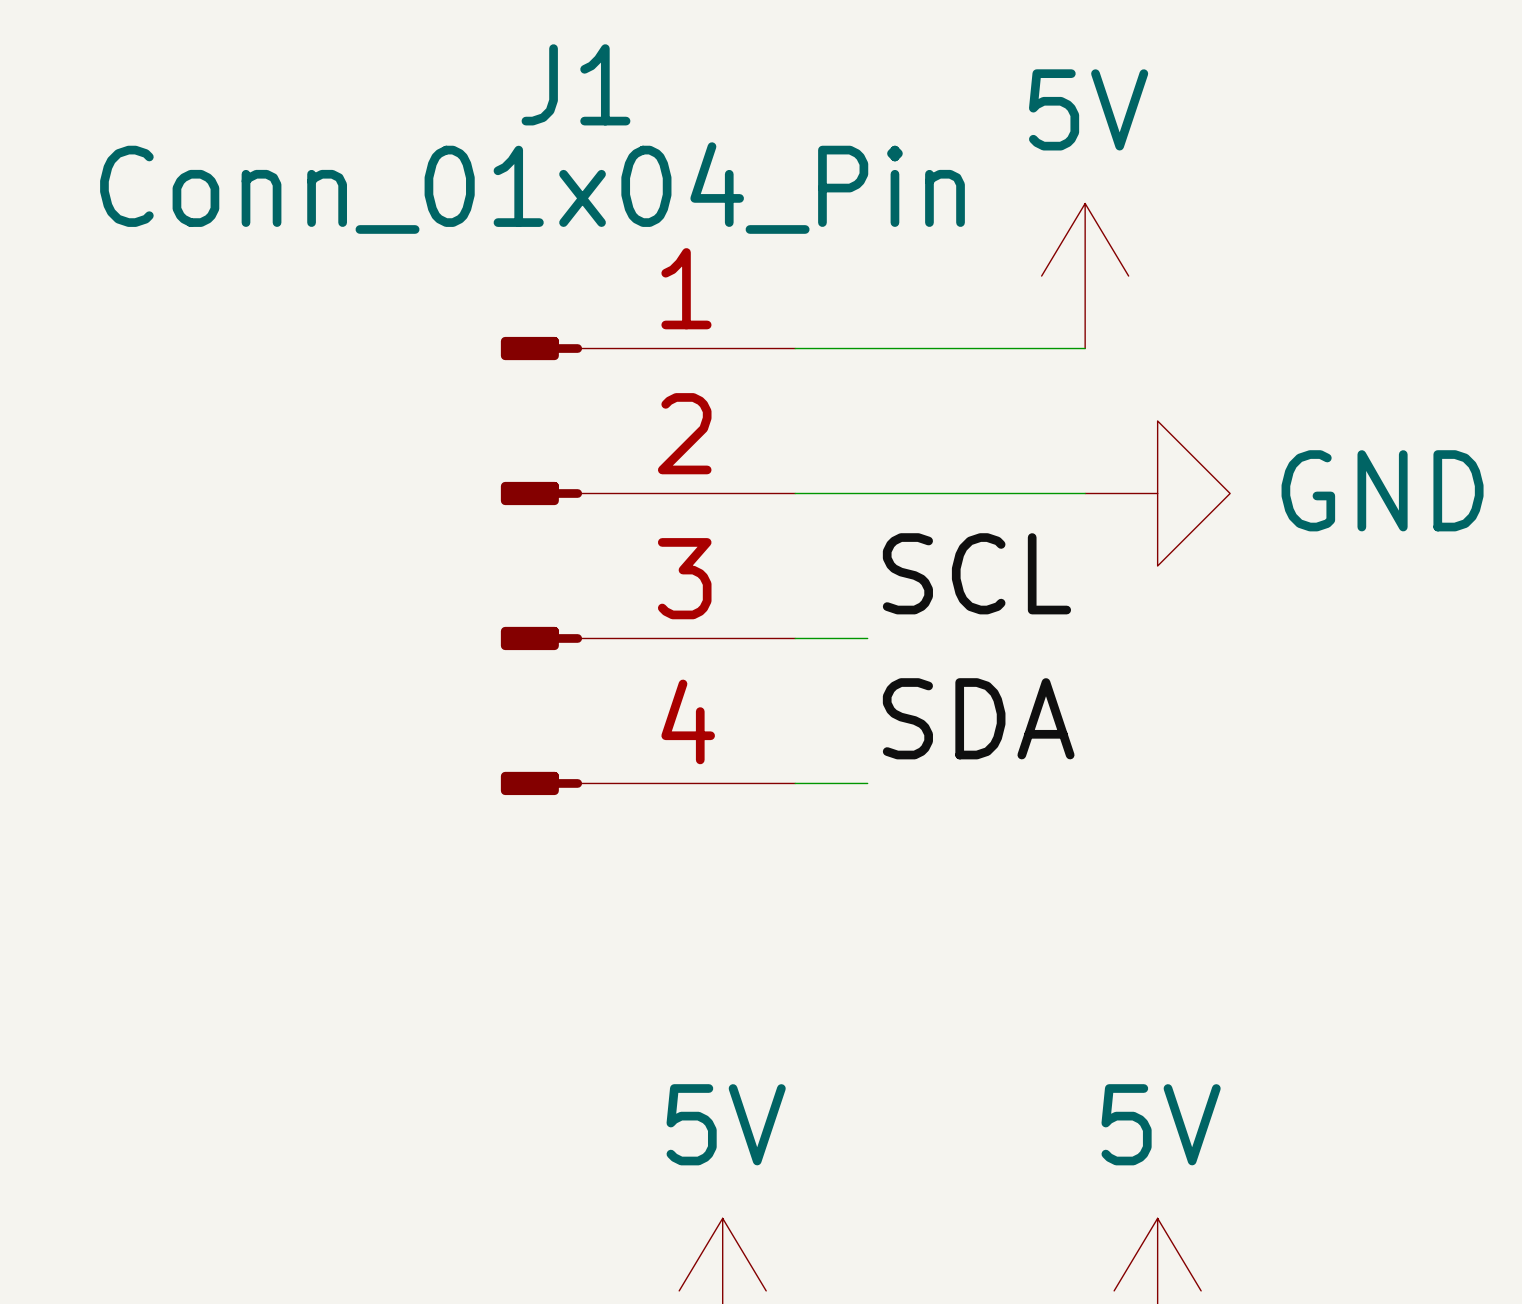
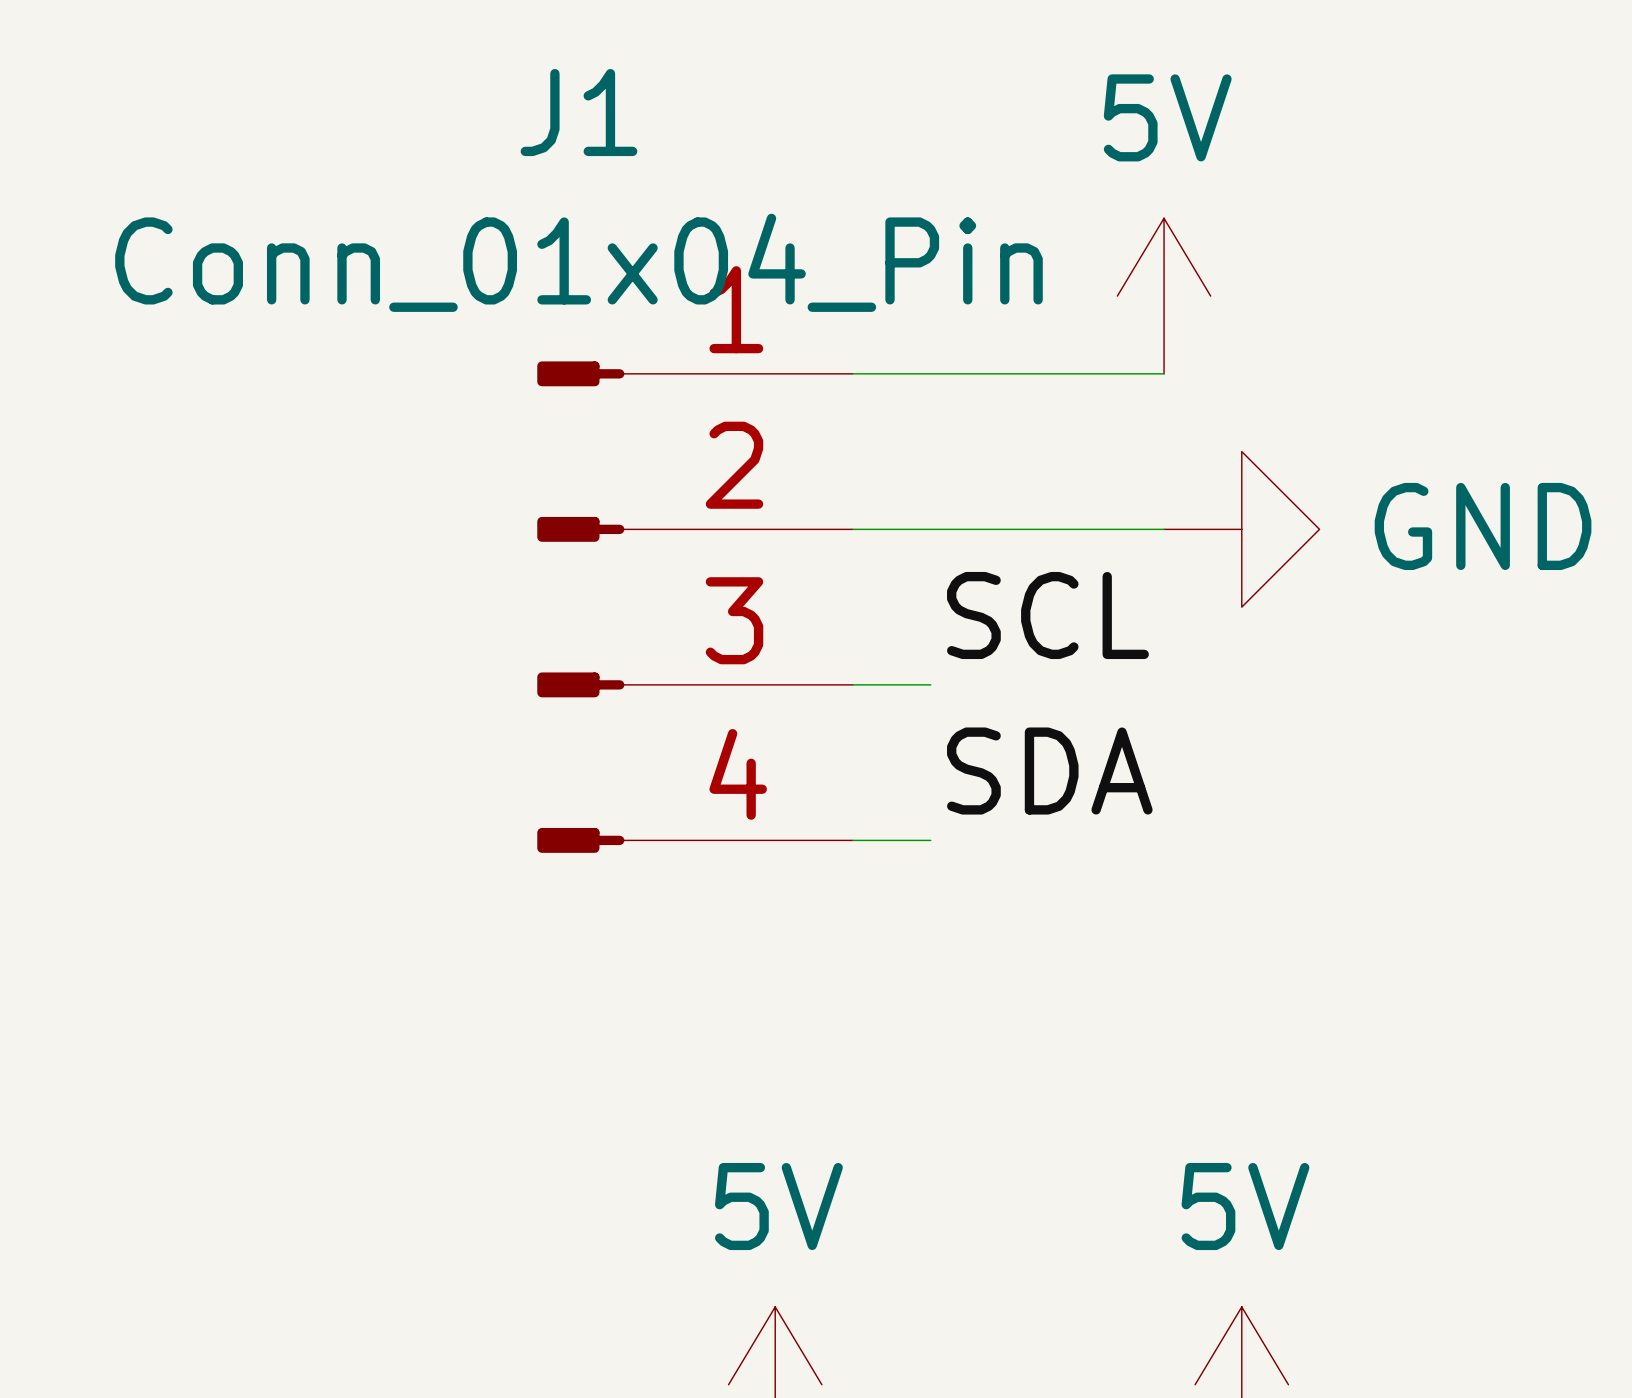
J1 name position: J1 (575, 84) -> J1 (578, 112)
J1 value position: Conn_01x04_Pin (532, 188) -> Conn_01x04_Pin (578, 262)

